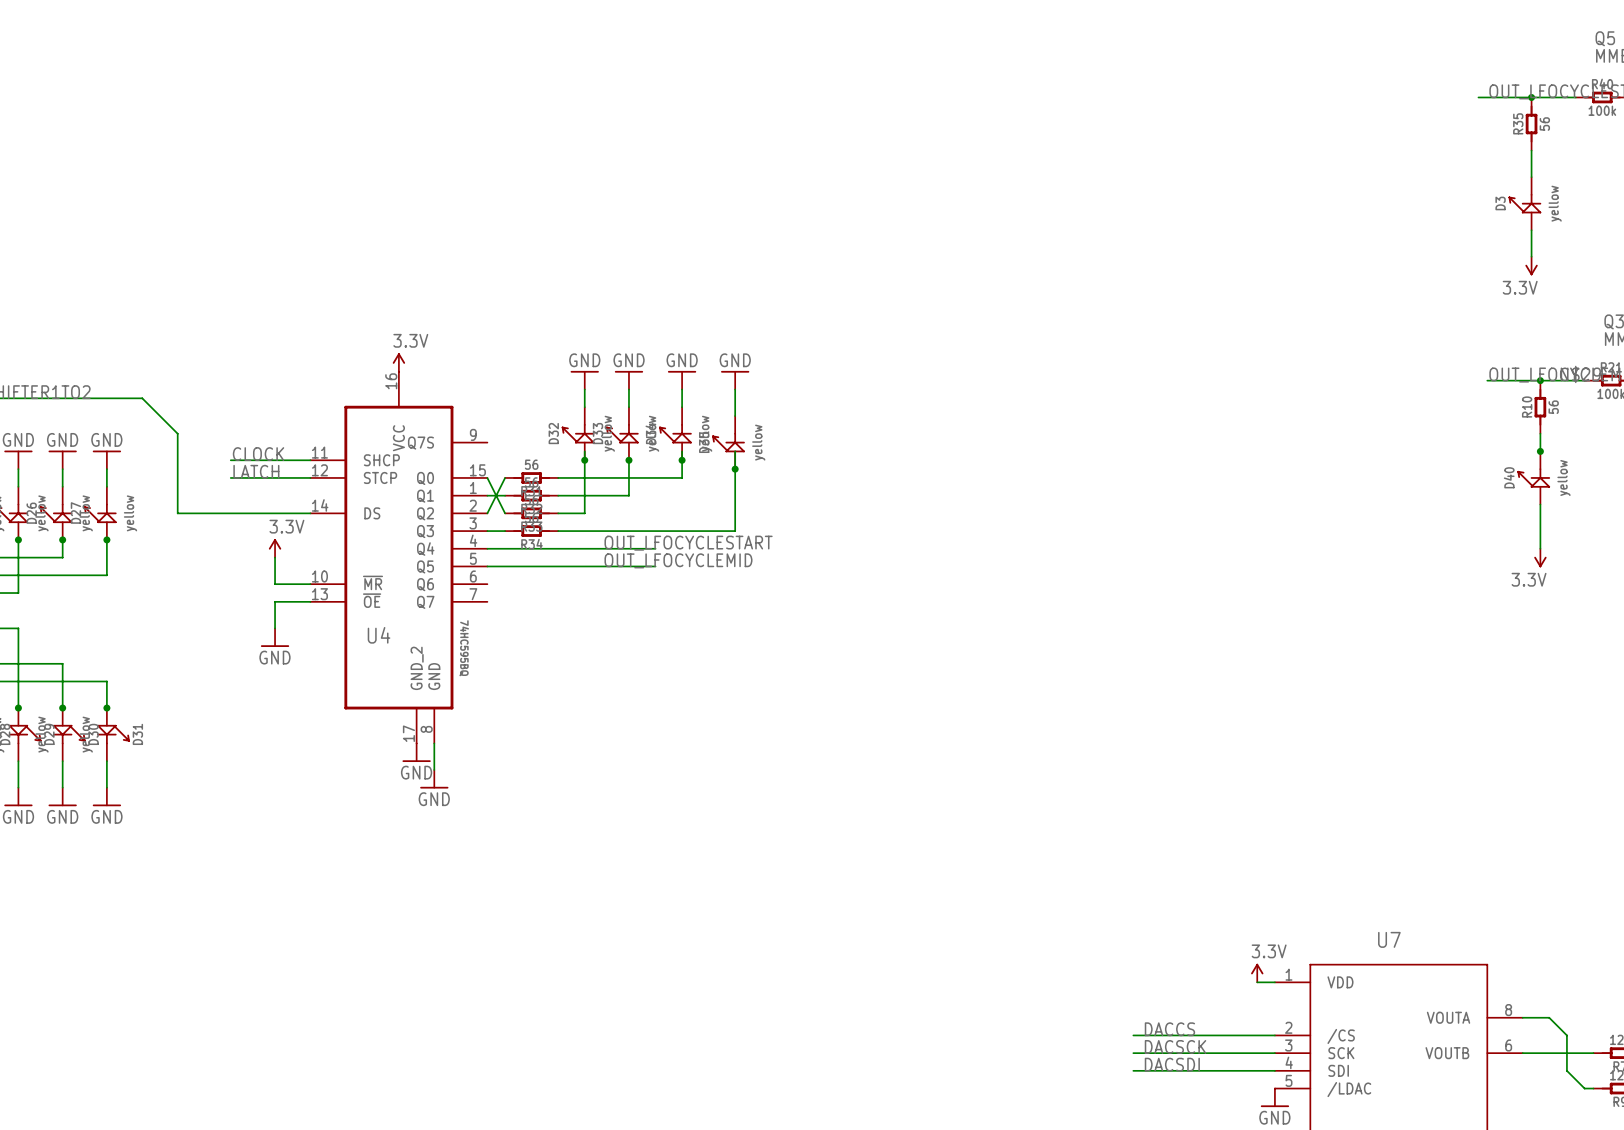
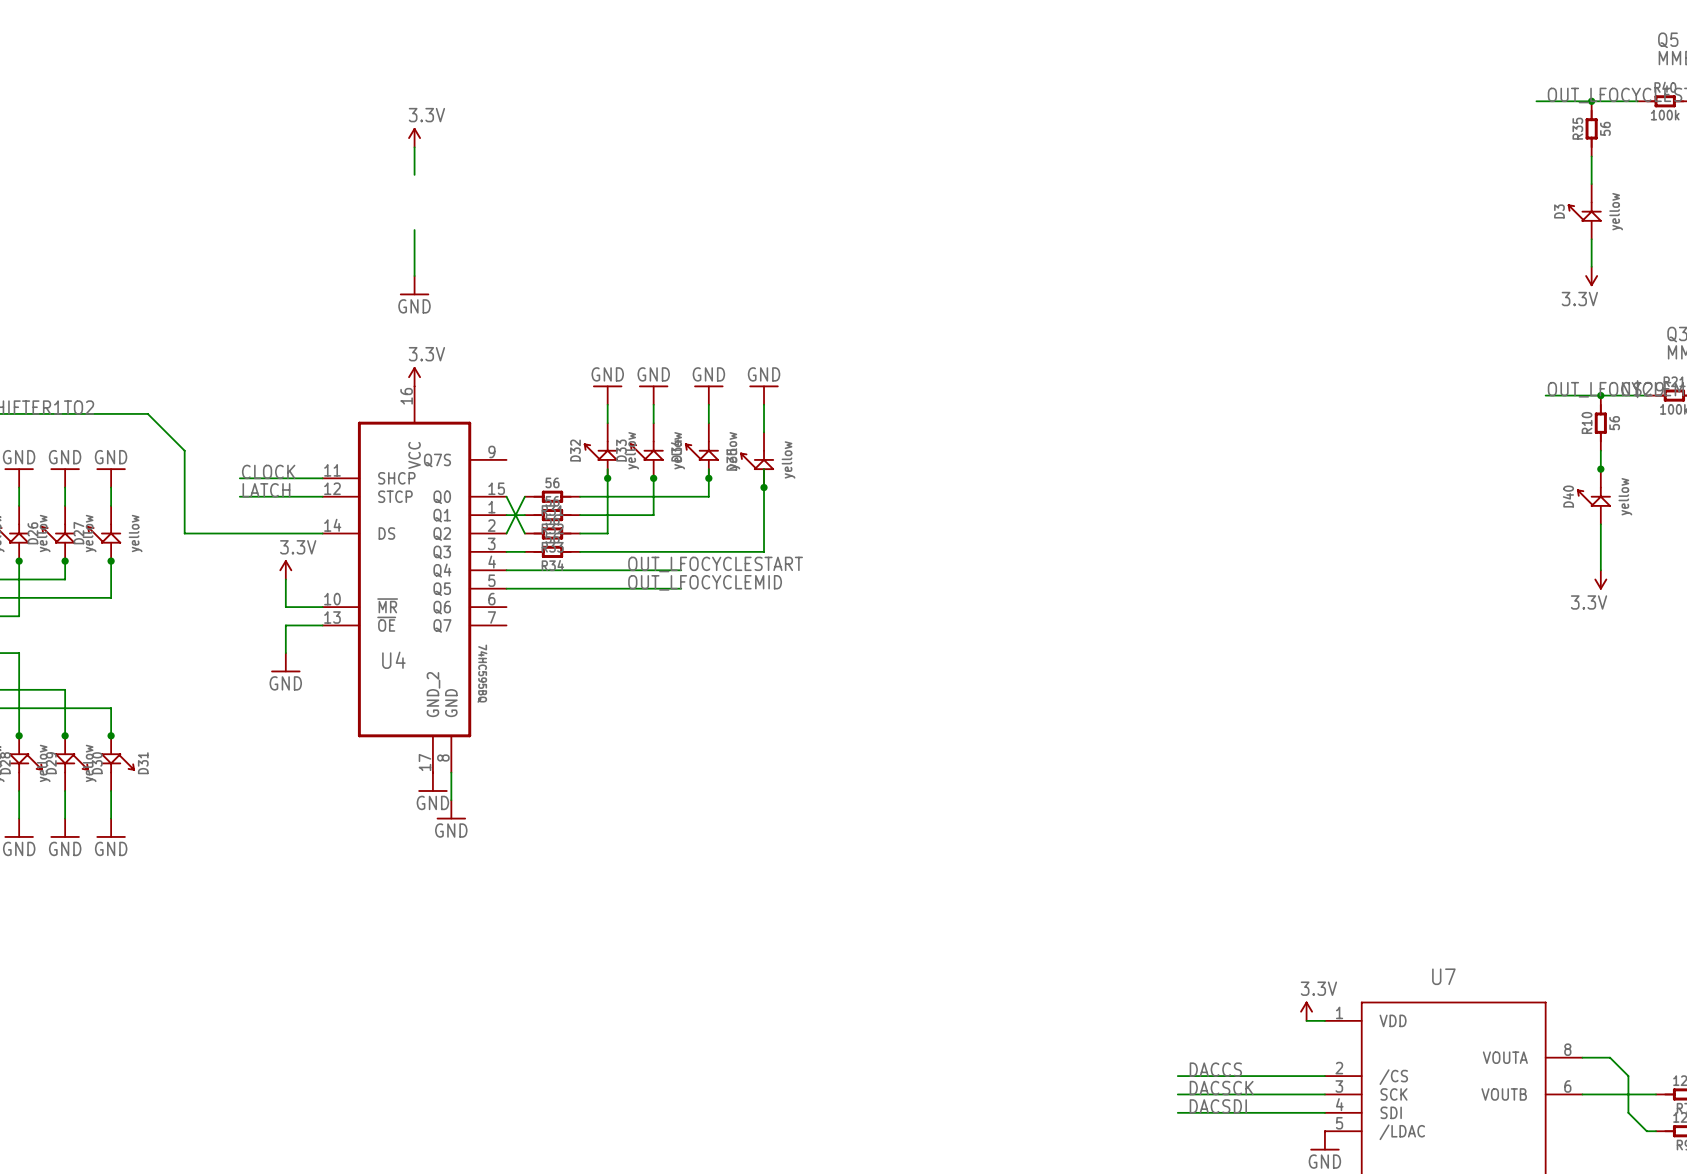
power symbol: none -> 3.3V (414, 137)
wire: none -> (414, 147) (414, 174)
wire: none -> (414, 230) (414, 276)
power symbol: none -> GND (414, 285)

